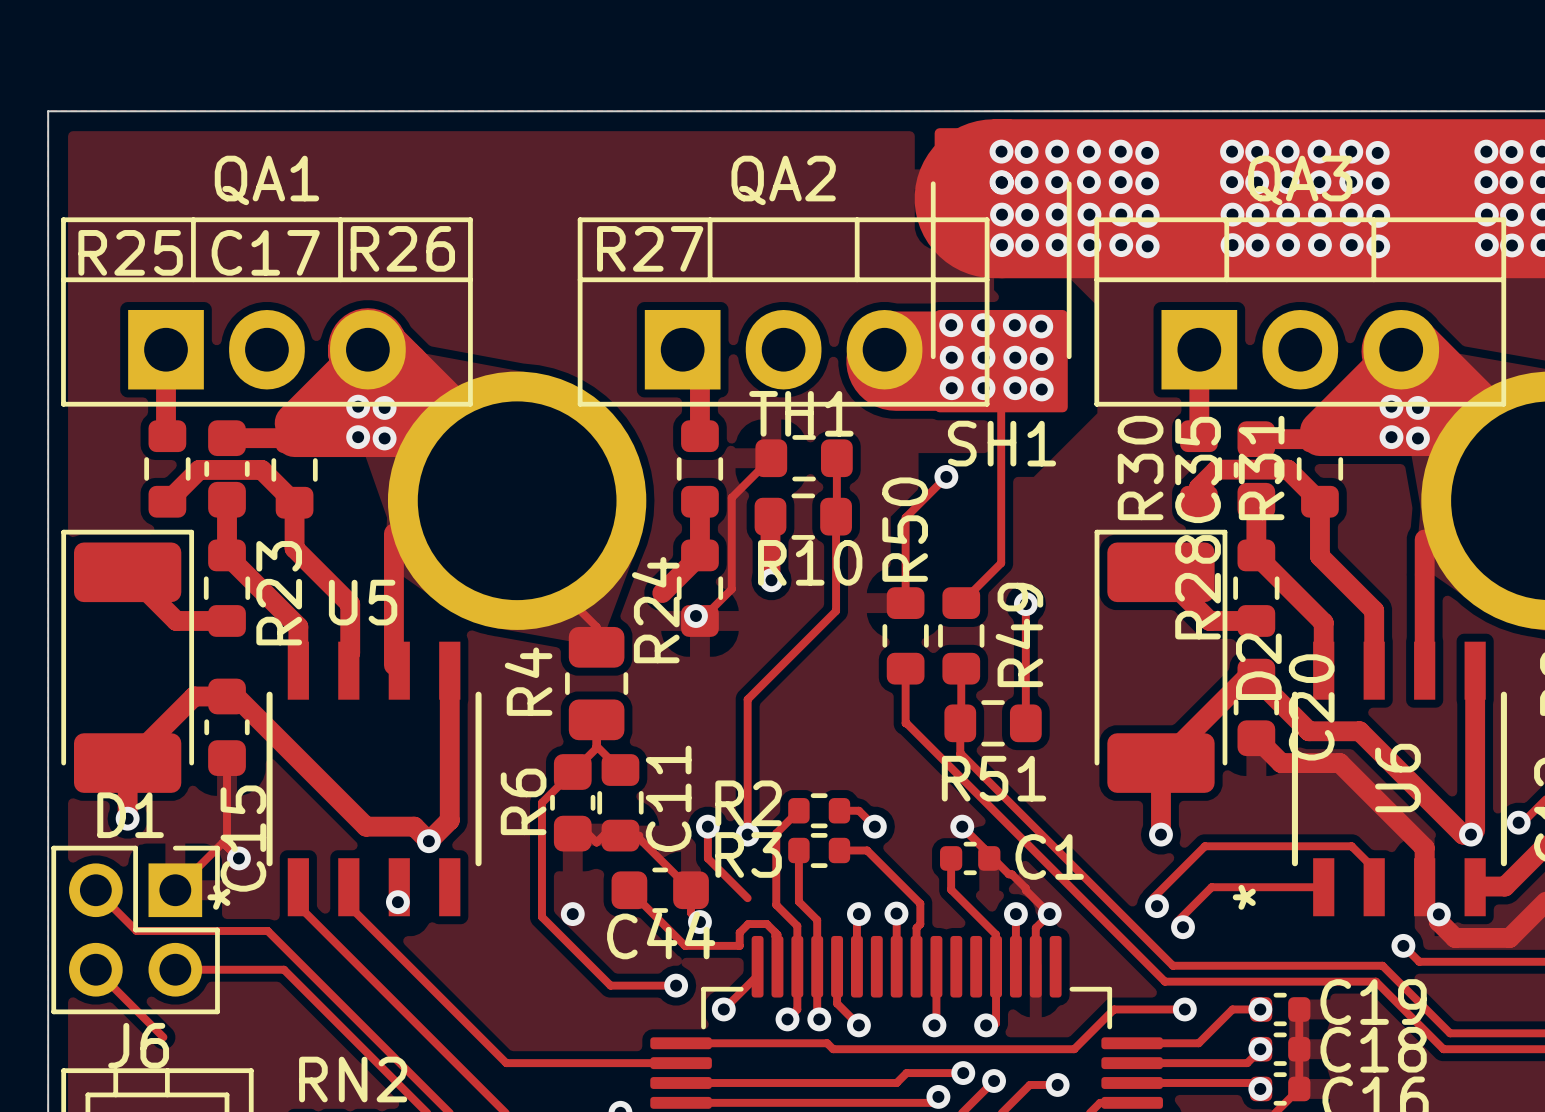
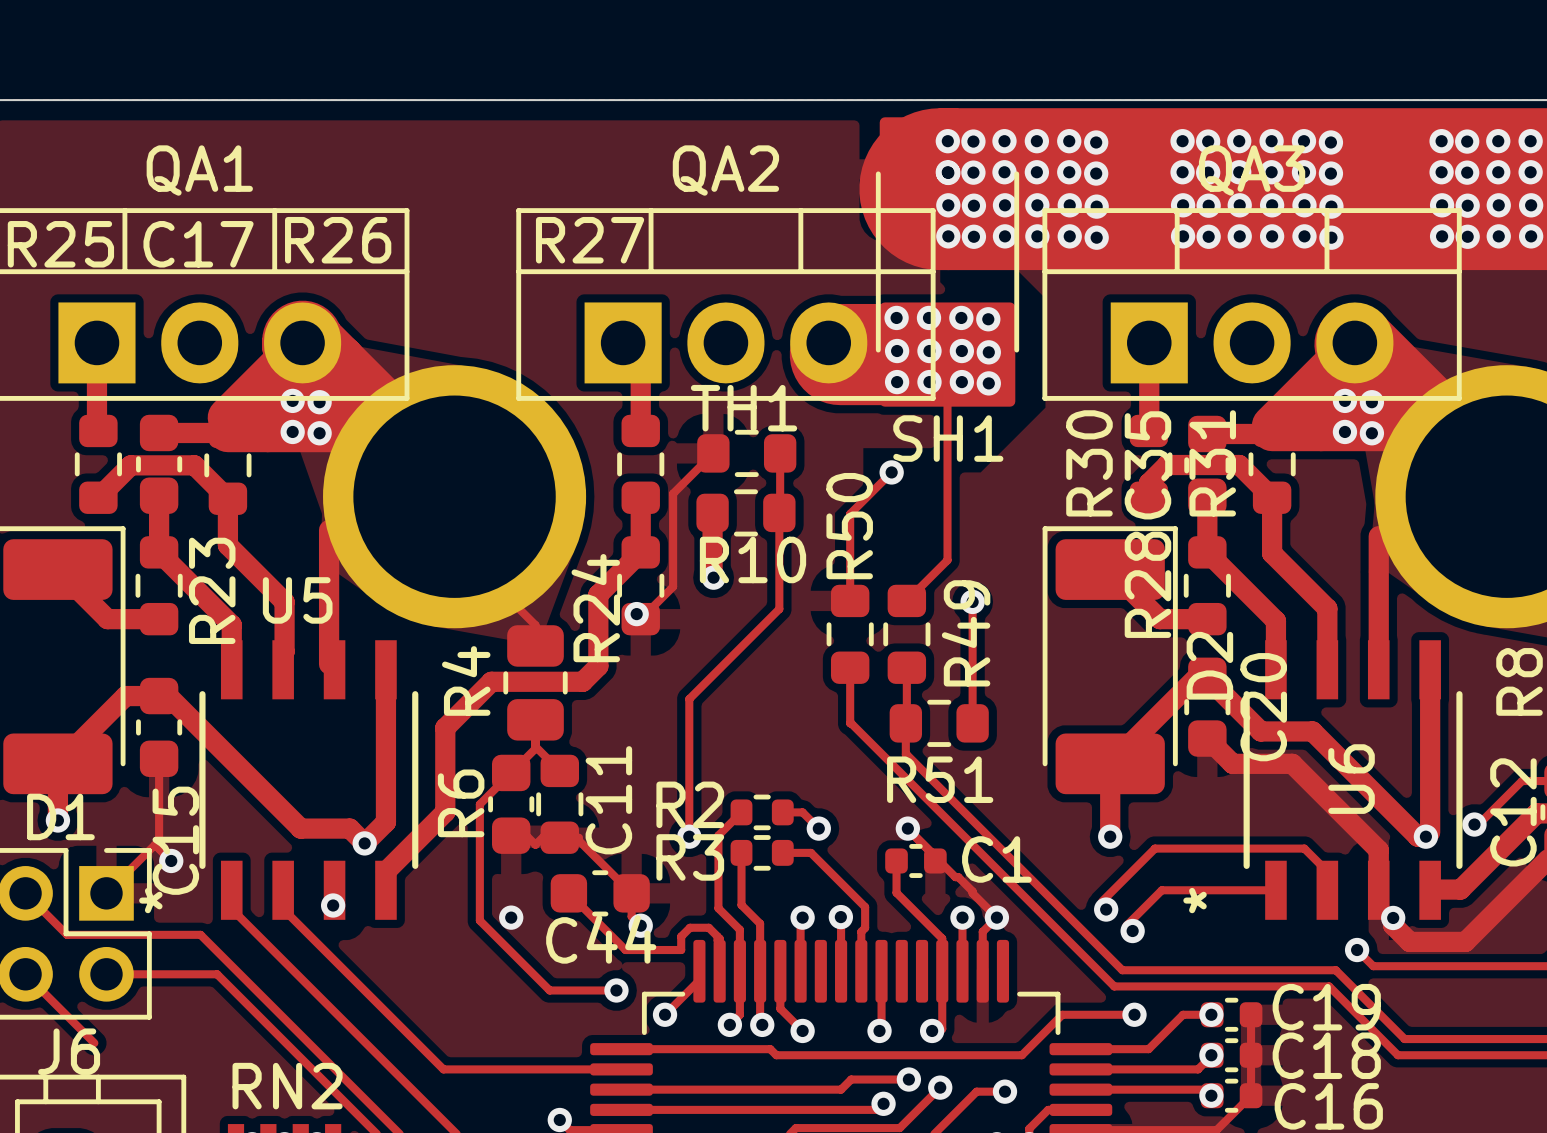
track: none -> (602, 590) (598, 594) (598, 666) (582, 681) (491, 681) (445, 727) (445, 812) (385, 871) (385, 890)
track: (707, 826) (707, 858) (747, 898) -> none
via: (707, 826) -> none

